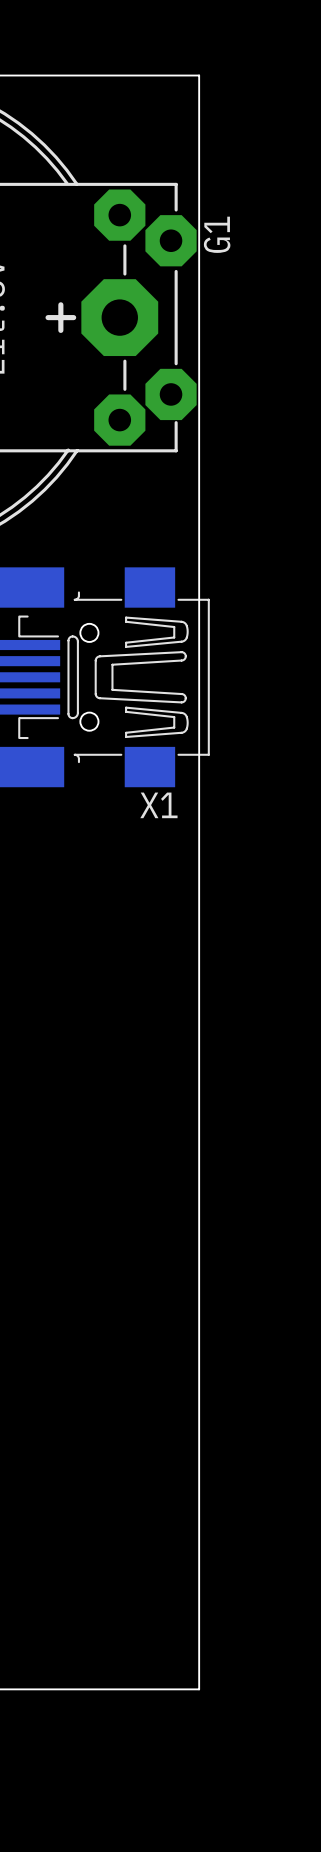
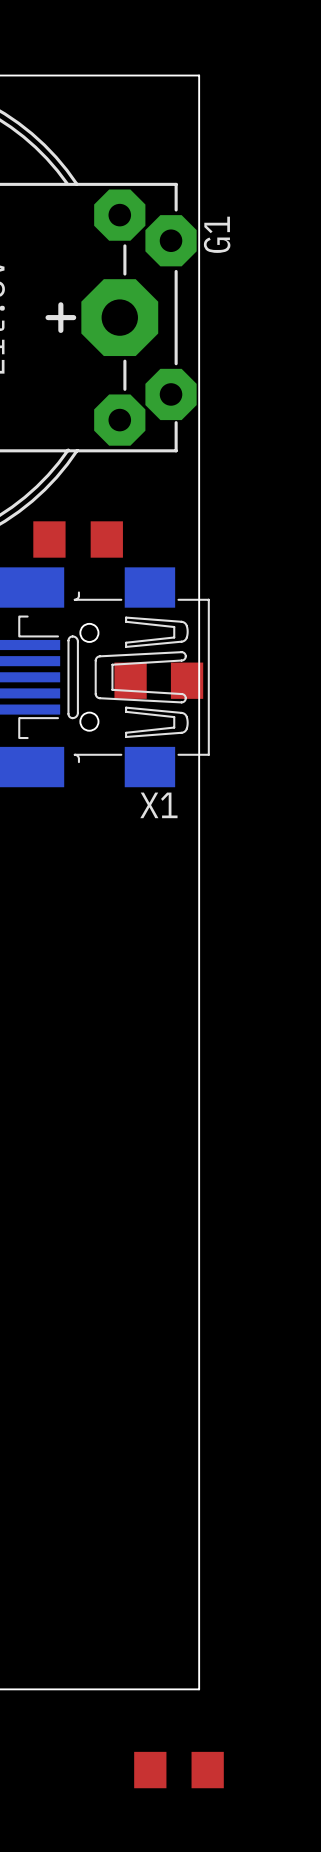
part: none -> (78, 539)
part: none -> (158, 680)
part: none -> (178, 1770)

